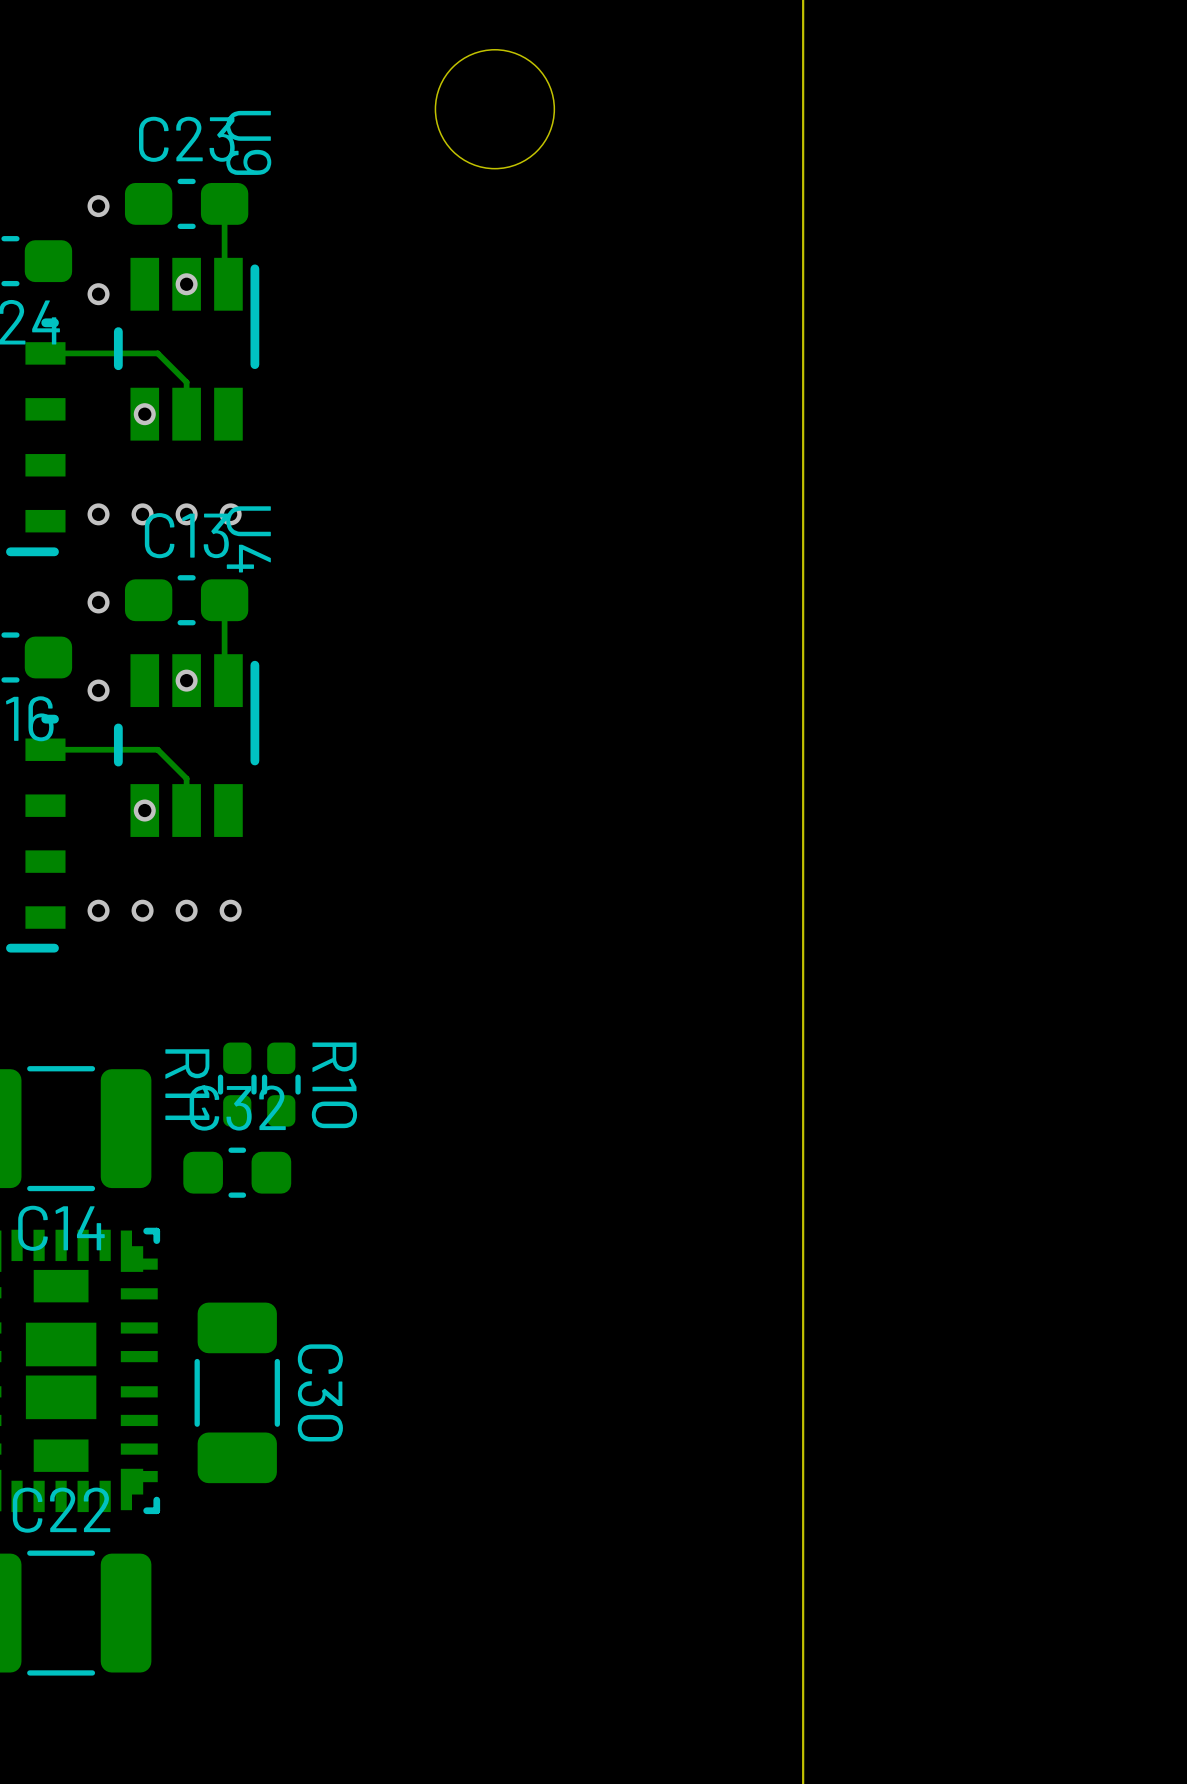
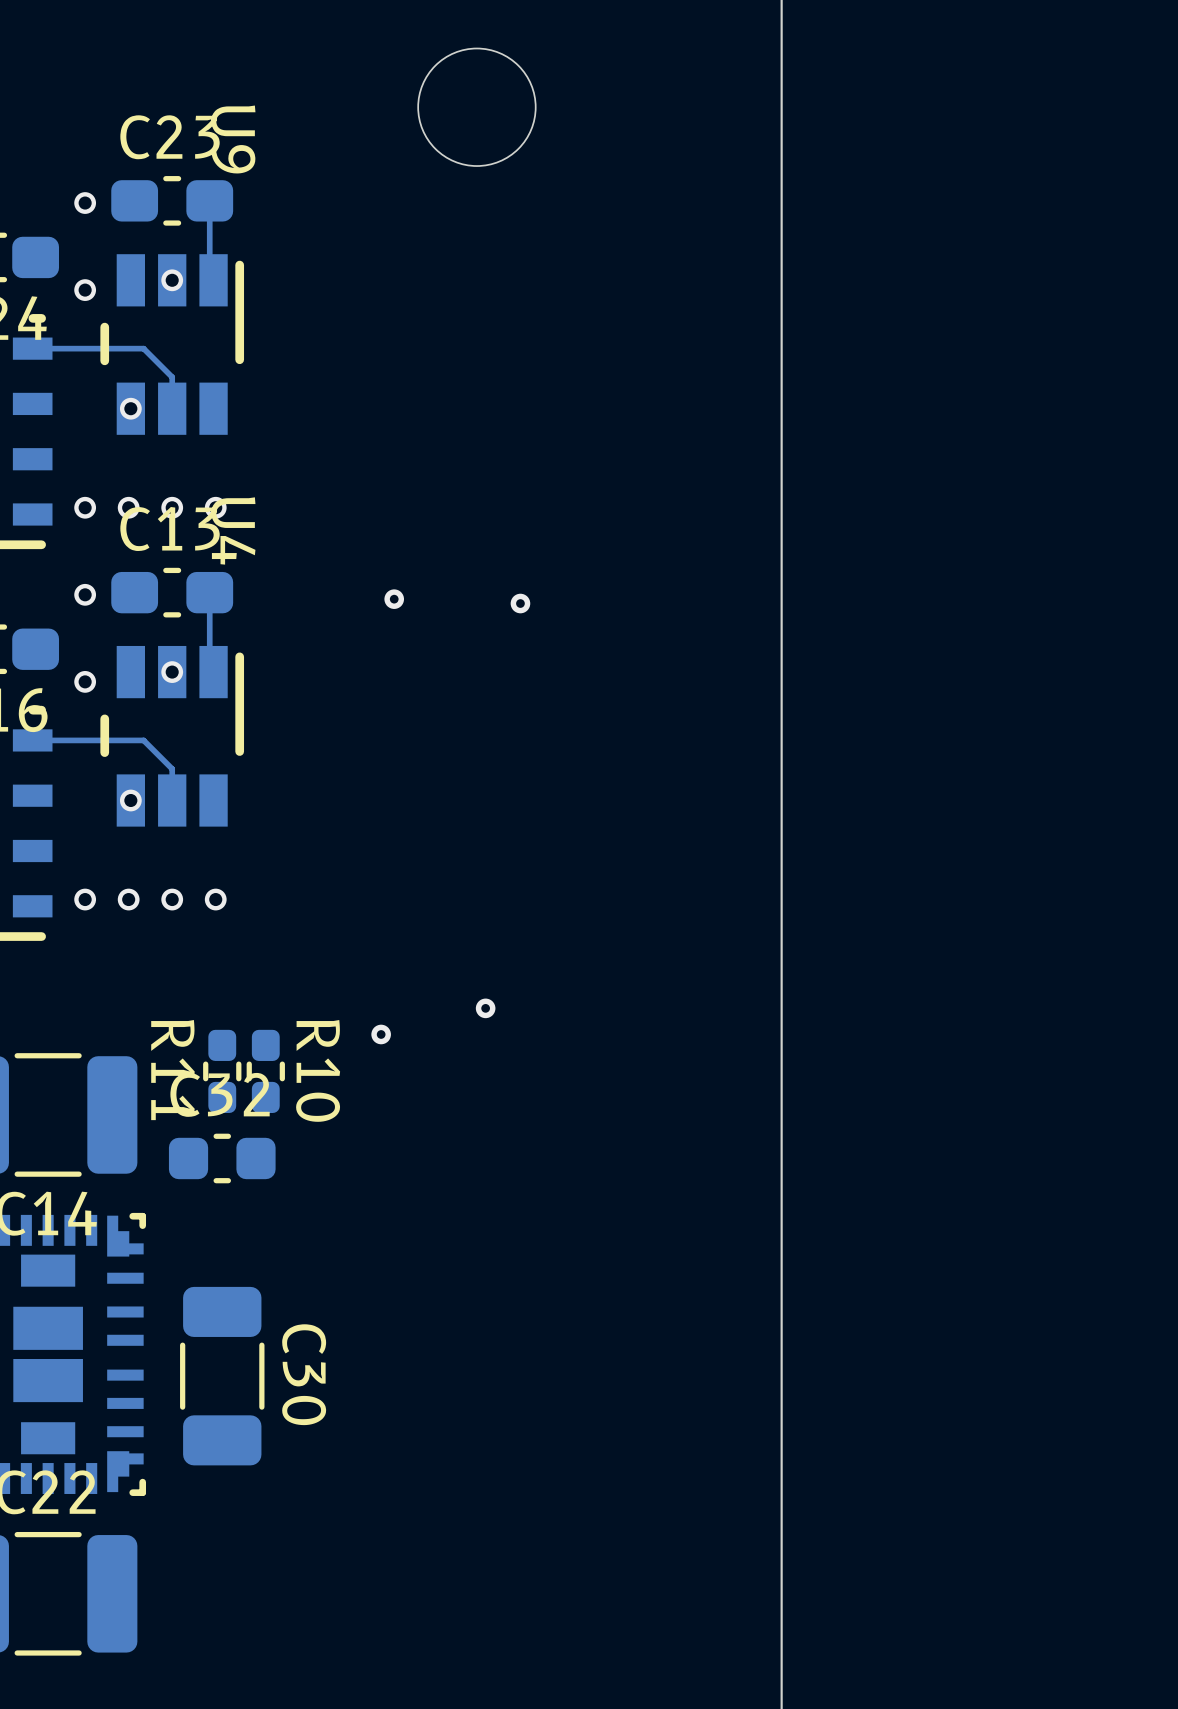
via: none -> (394, 599)
via: none -> (520, 603)
via: none -> (485, 1008)
via: none -> (381, 1034)

